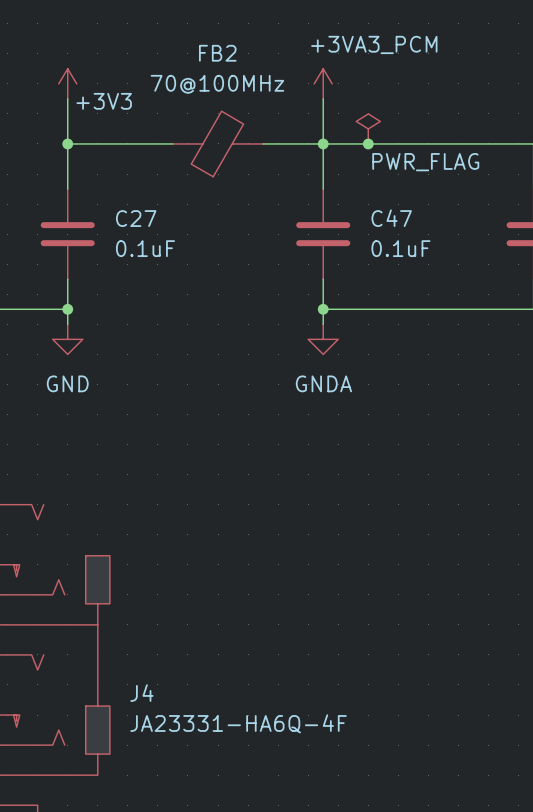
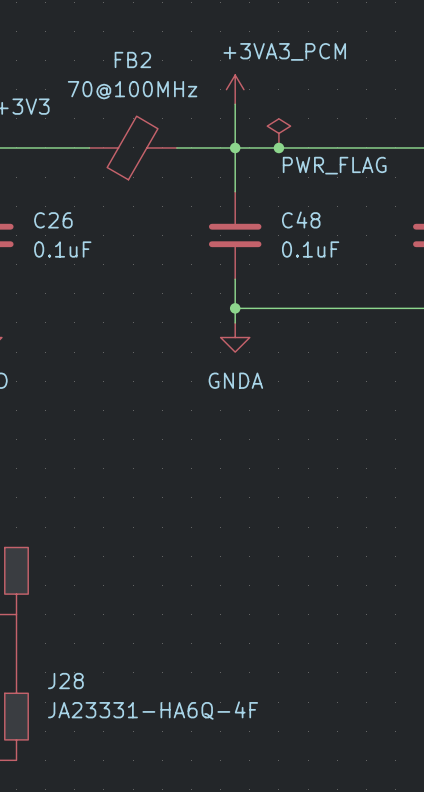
C27 name: C27 (136, 218) -> C26 (53, 220)
C47 name: C47 (391, 218) -> C48 (301, 220)
J4 name: J4 (141, 693) -> J28 (65, 681)

